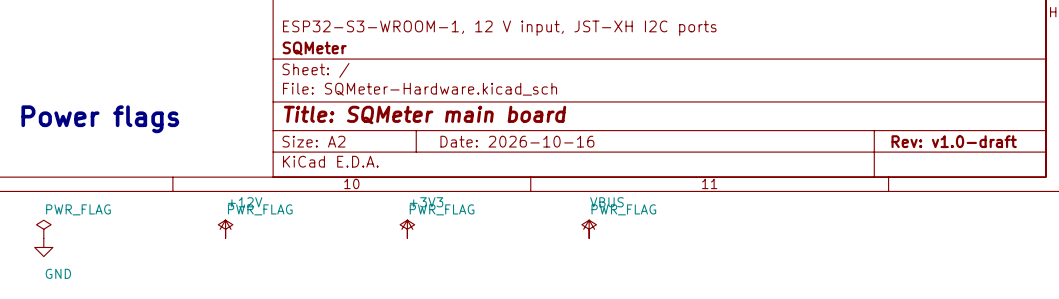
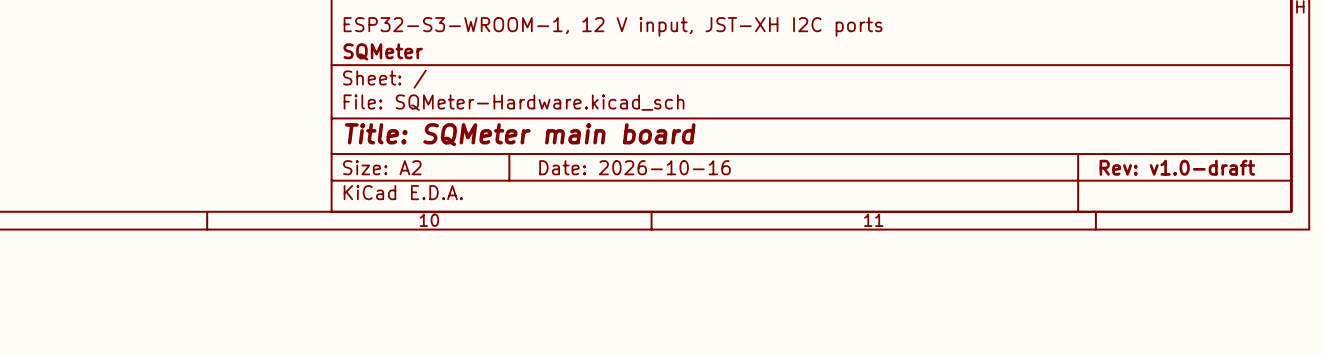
text: Power flags (100, 119) -> none
power symbol: PWR_FLAG (43, 229) -> none
power symbol: PWR_FLAG (225, 229) -> none
power symbol: +12V (225, 229) -> none
power symbol: PWR_FLAG (407, 229) -> none
power symbol: +3V3 (407, 229) -> none
power symbol: PWR_FLAG (589, 229) -> none
power symbol: VBUS (589, 229) -> none
power symbol: GND (43, 247) -> none

